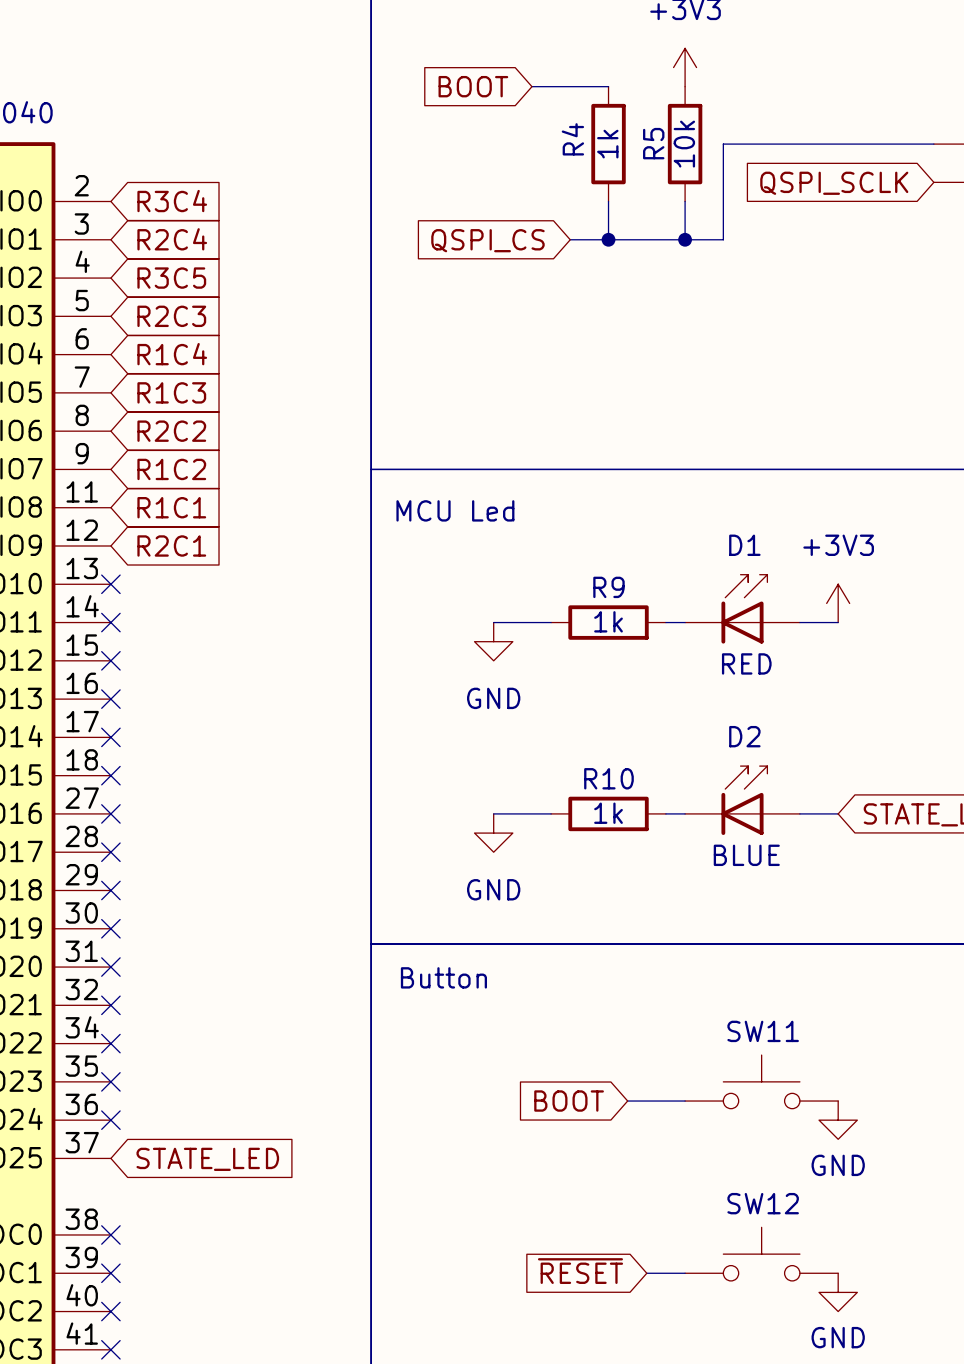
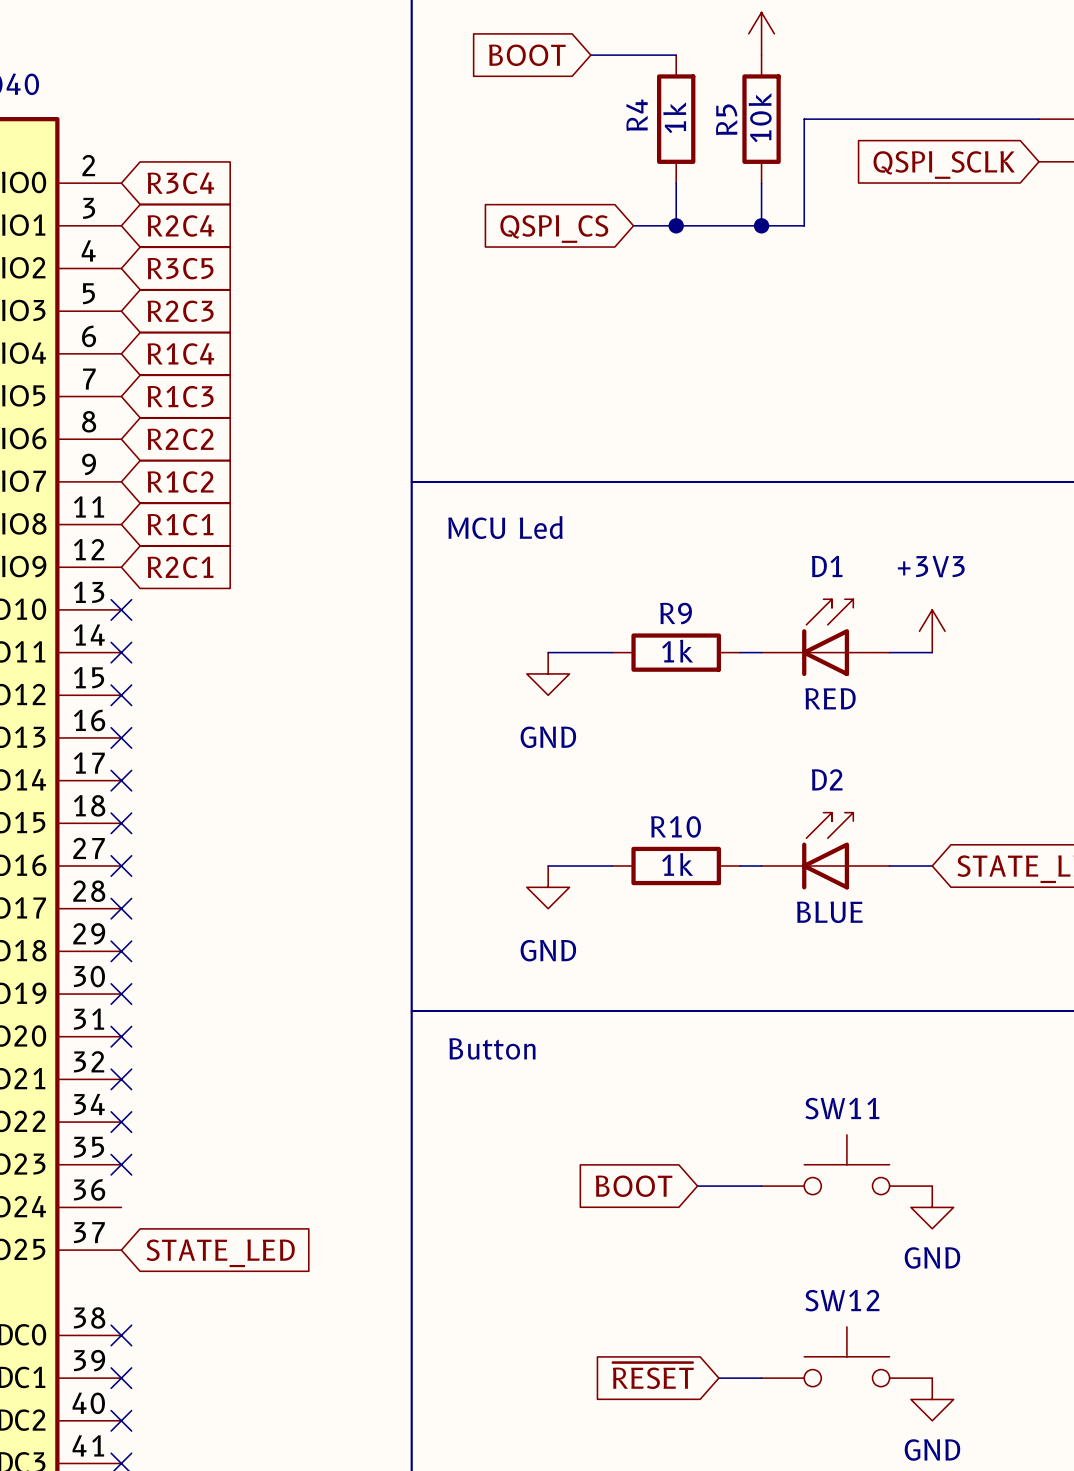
no-connect mark: (110, 1120) -> none

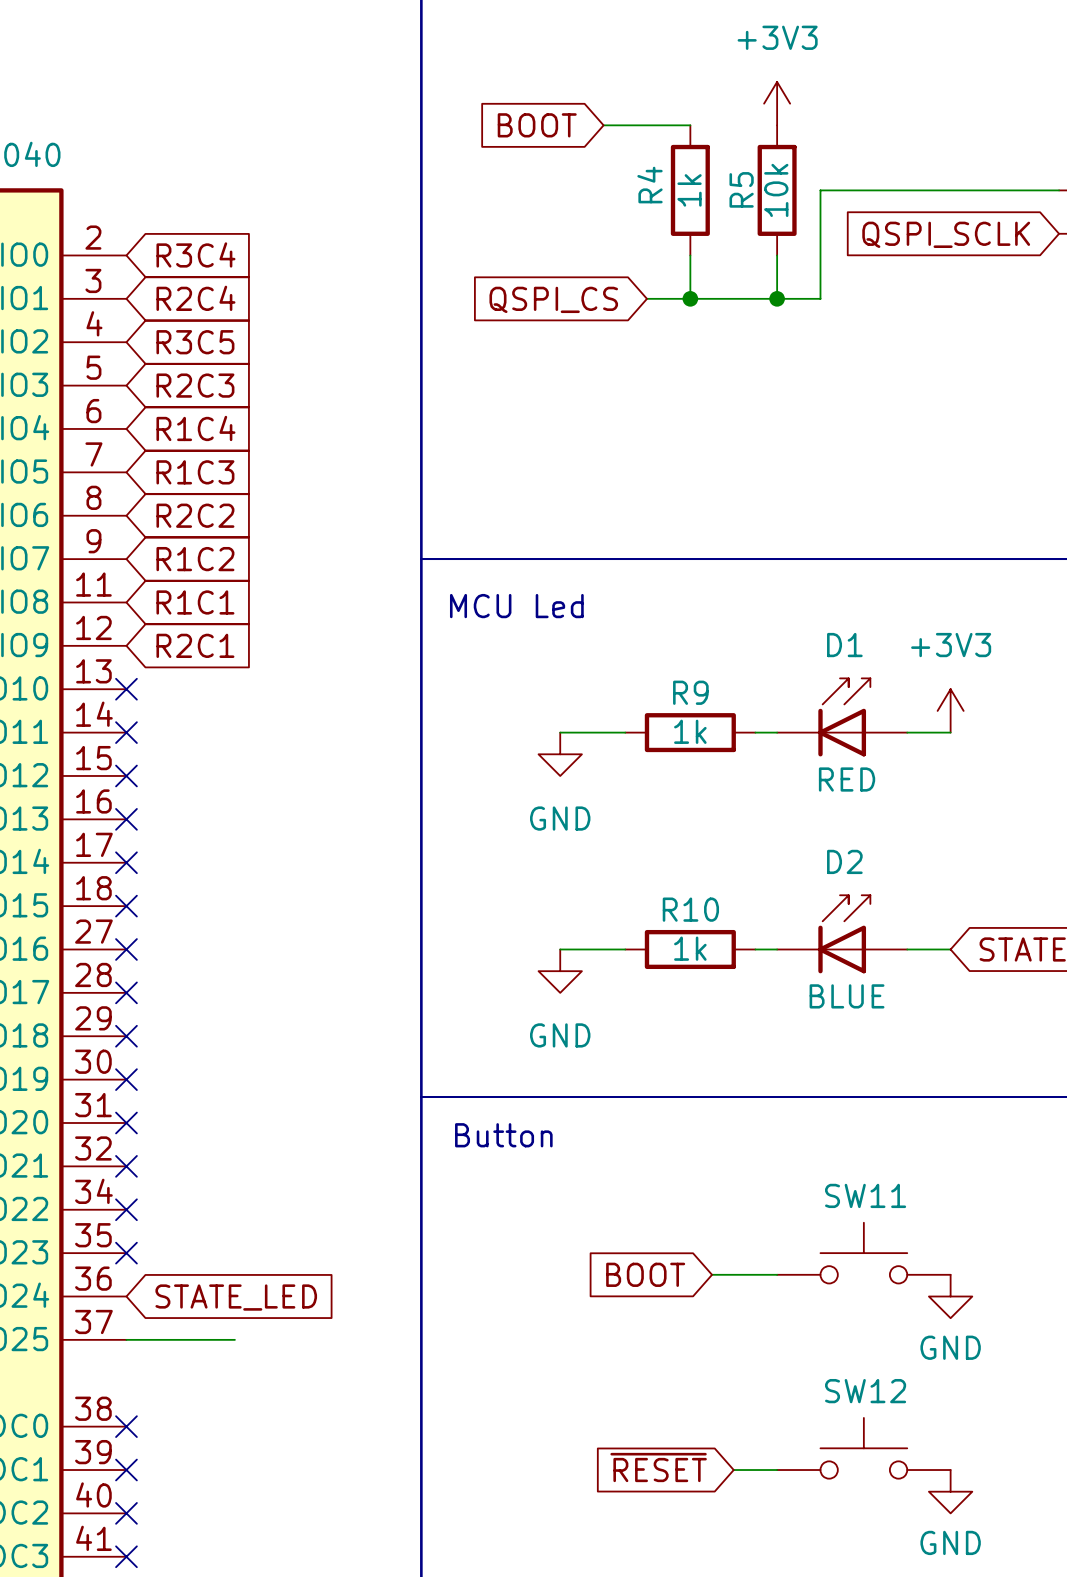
wire: none -> (126, 1339) (234, 1339)
global label position: STATE_LED (220, 1253) -> STATE_LED (236, 1297)

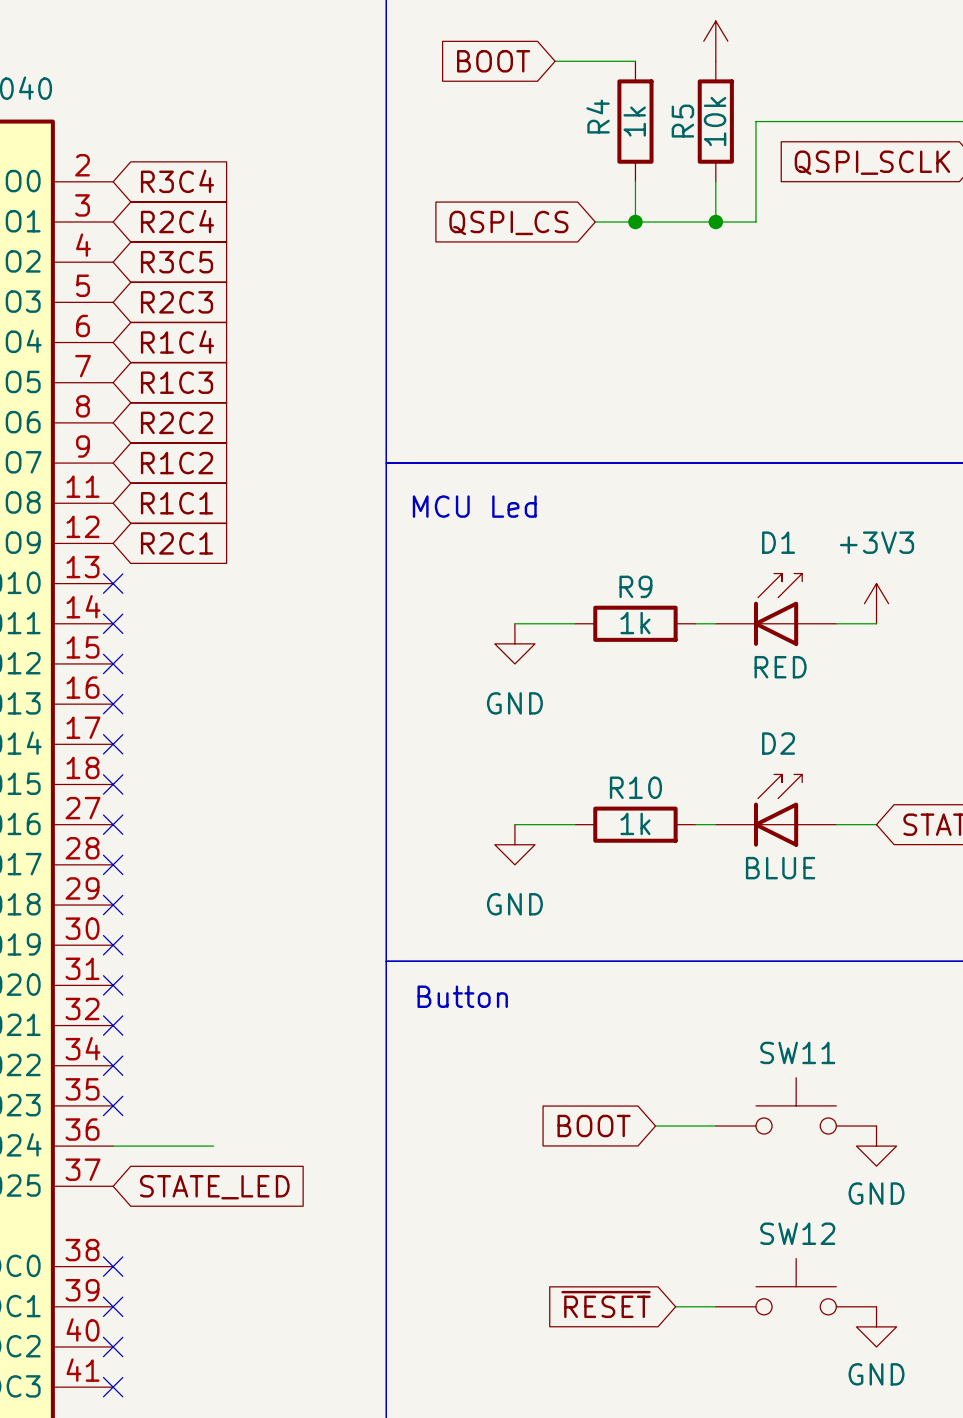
global label position: STATE_LED (236, 1297) -> STATE_LED (214, 1187)
wire: (126, 1339) (234, 1339) -> (113, 1146) (213, 1146)

